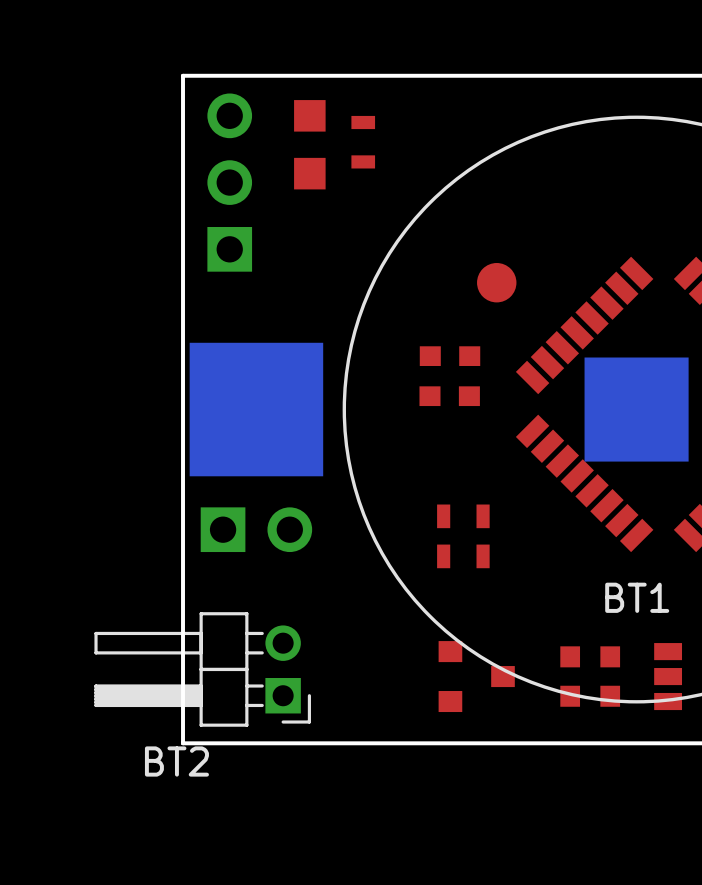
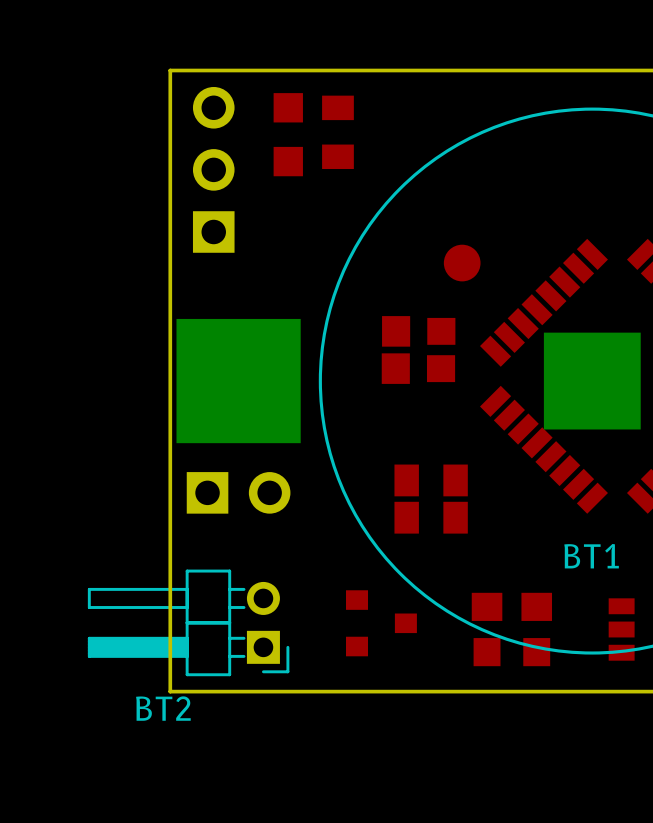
part footprint: [351, 115, 376, 169] -> [322, 95, 354, 170]
part footprint: [419, 346, 481, 366] -> [382, 316, 456, 347]
part footprint: [419, 386, 480, 407] -> [381, 353, 456, 384]
part footprint: [437, 504, 490, 529] -> [394, 464, 468, 497]
part footprint: [437, 544, 490, 569] -> [394, 501, 468, 534]
part footprint: [560, 646, 581, 707] -> [521, 592, 553, 667]
part position: (476, 676) -> (381, 623)
part: none -> (487, 629)
part: (610, 676) -> none

